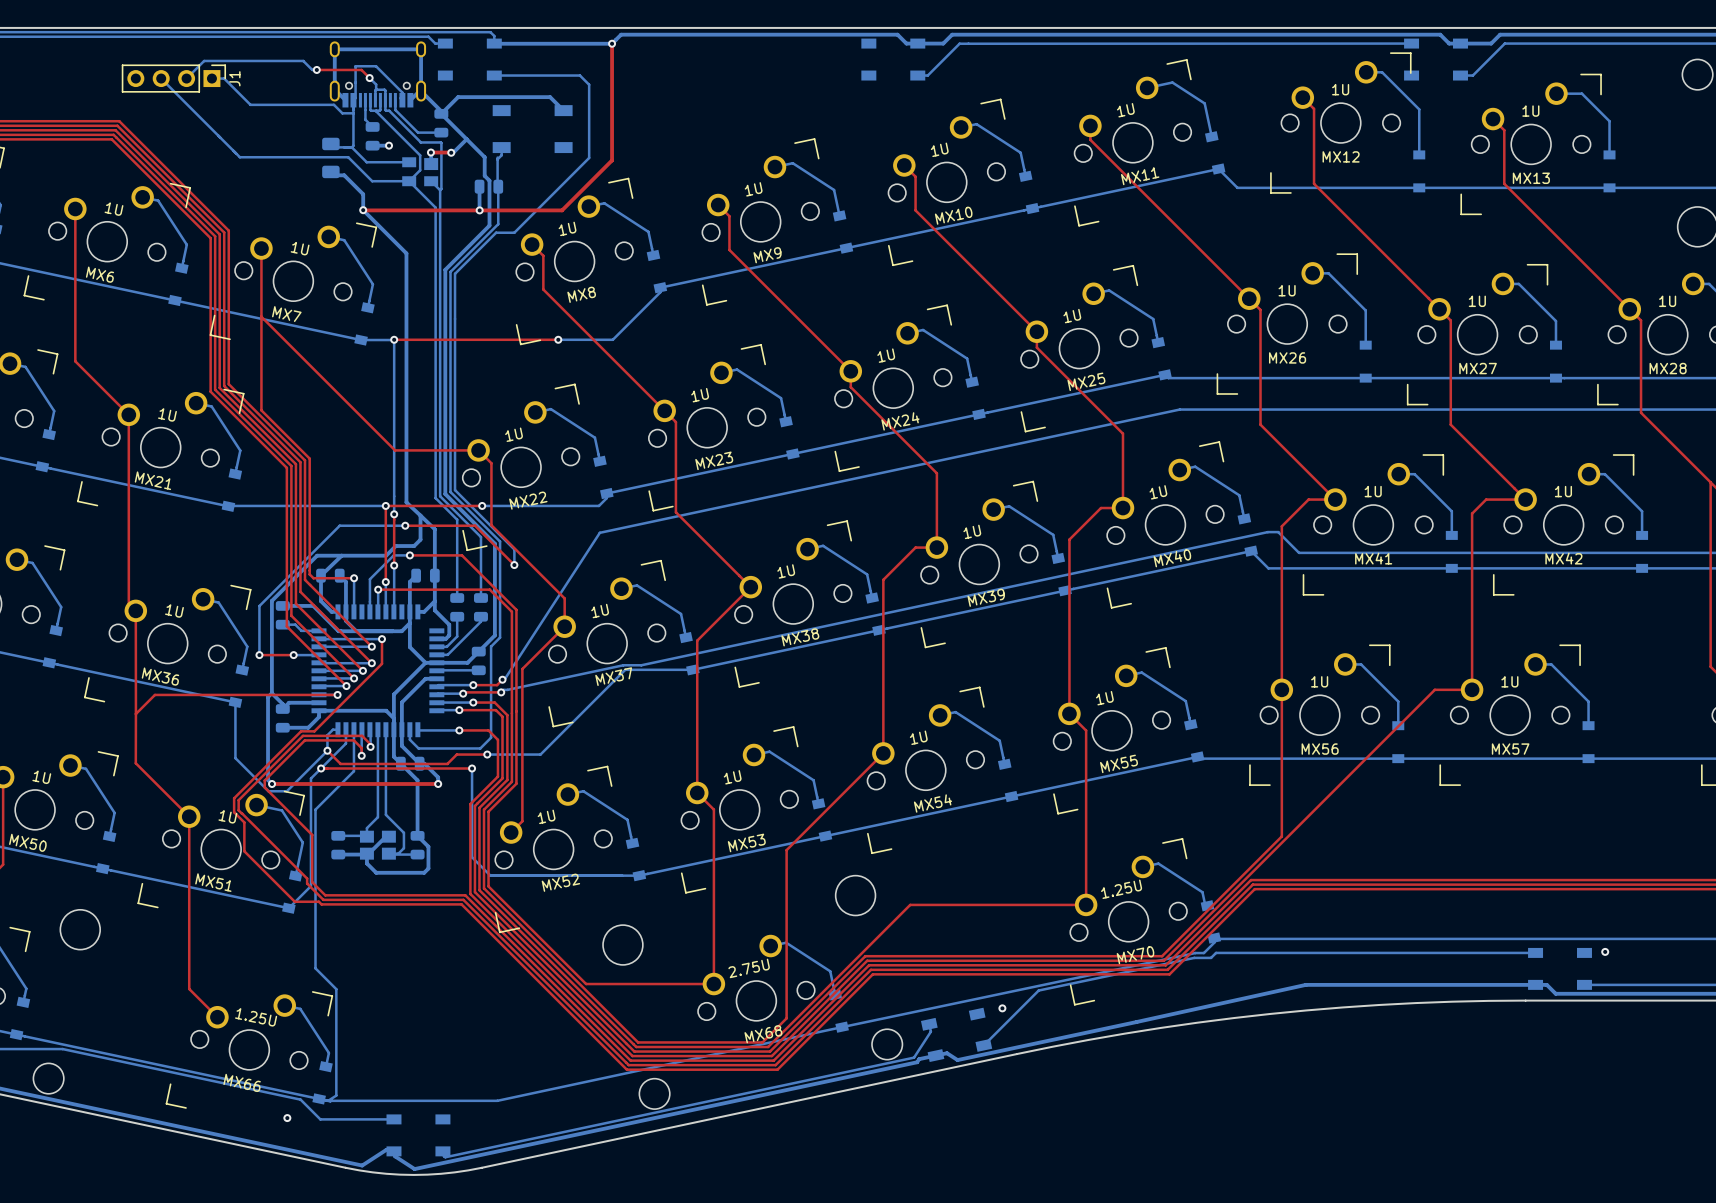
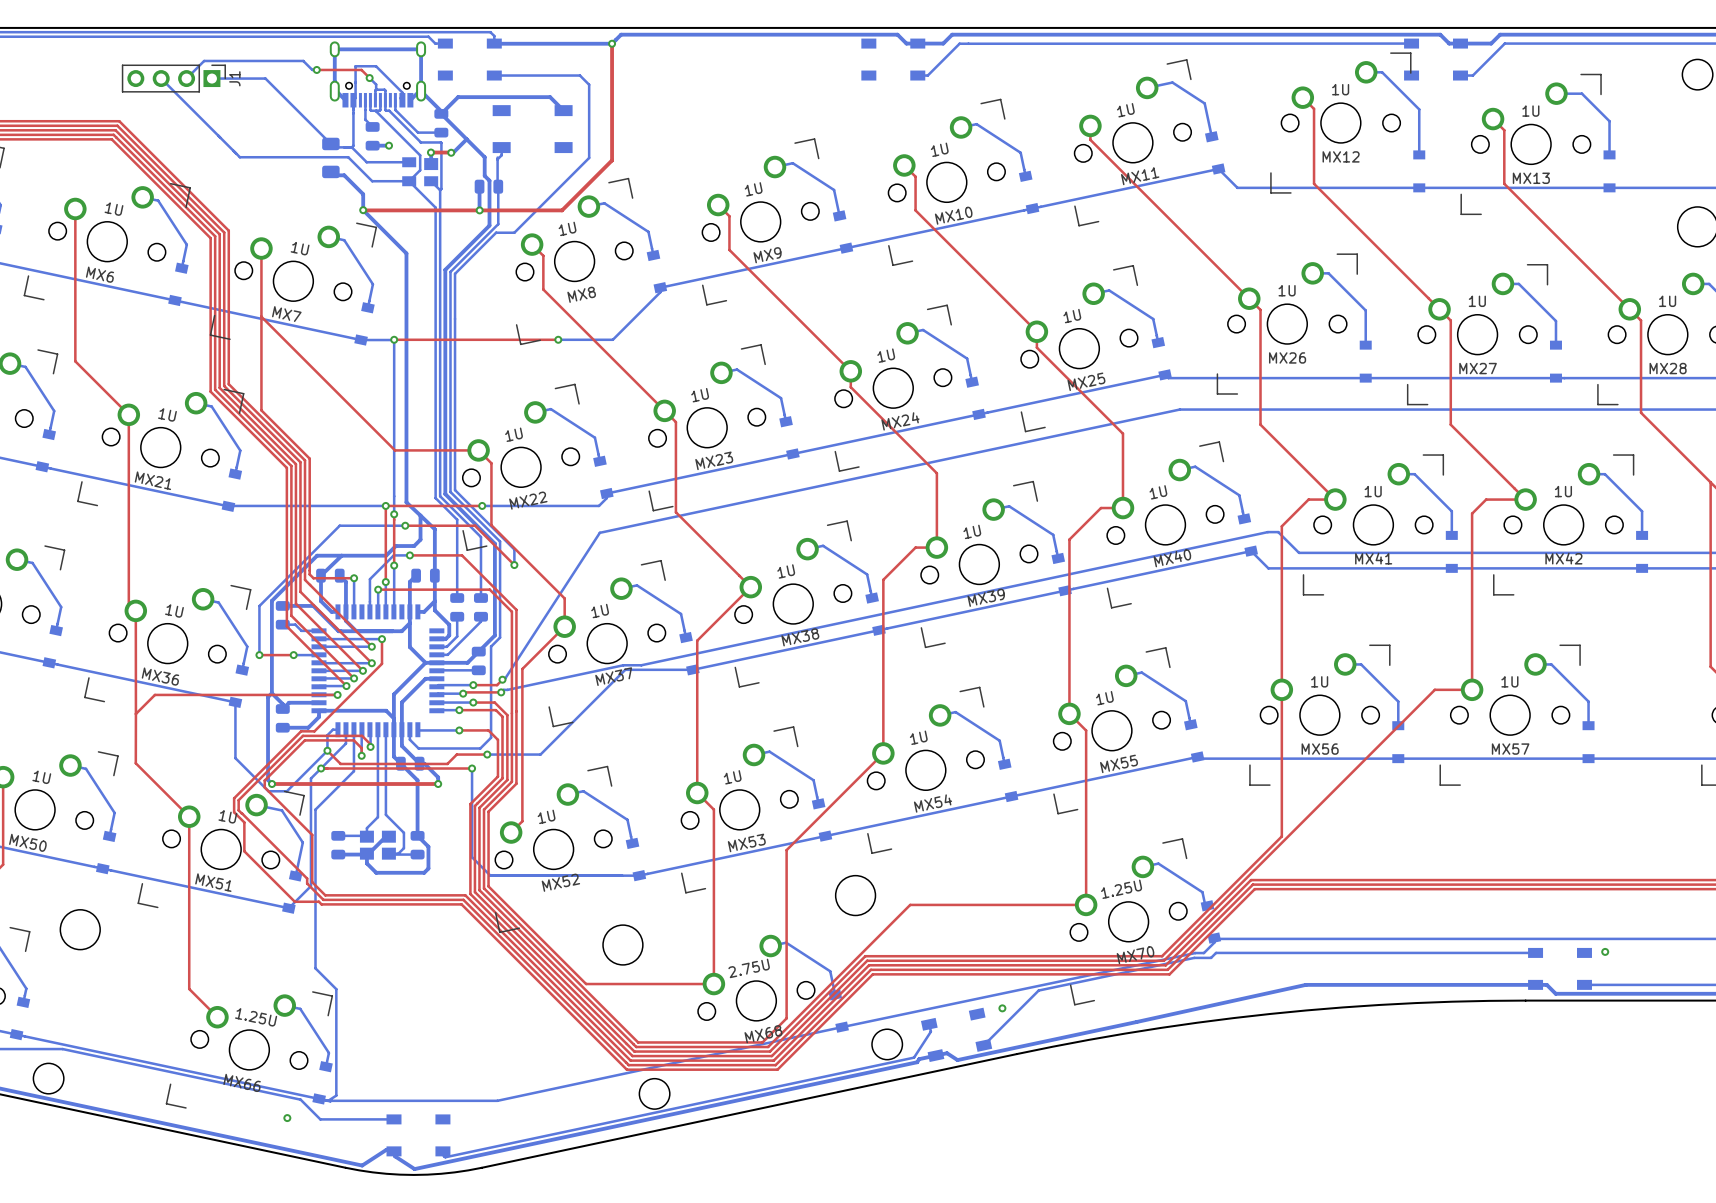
bottom track: (224, 78) (250, 104) (333, 104) (342, 113) (353, 113) -> (224, 78) (265, 78) (330, 143)

